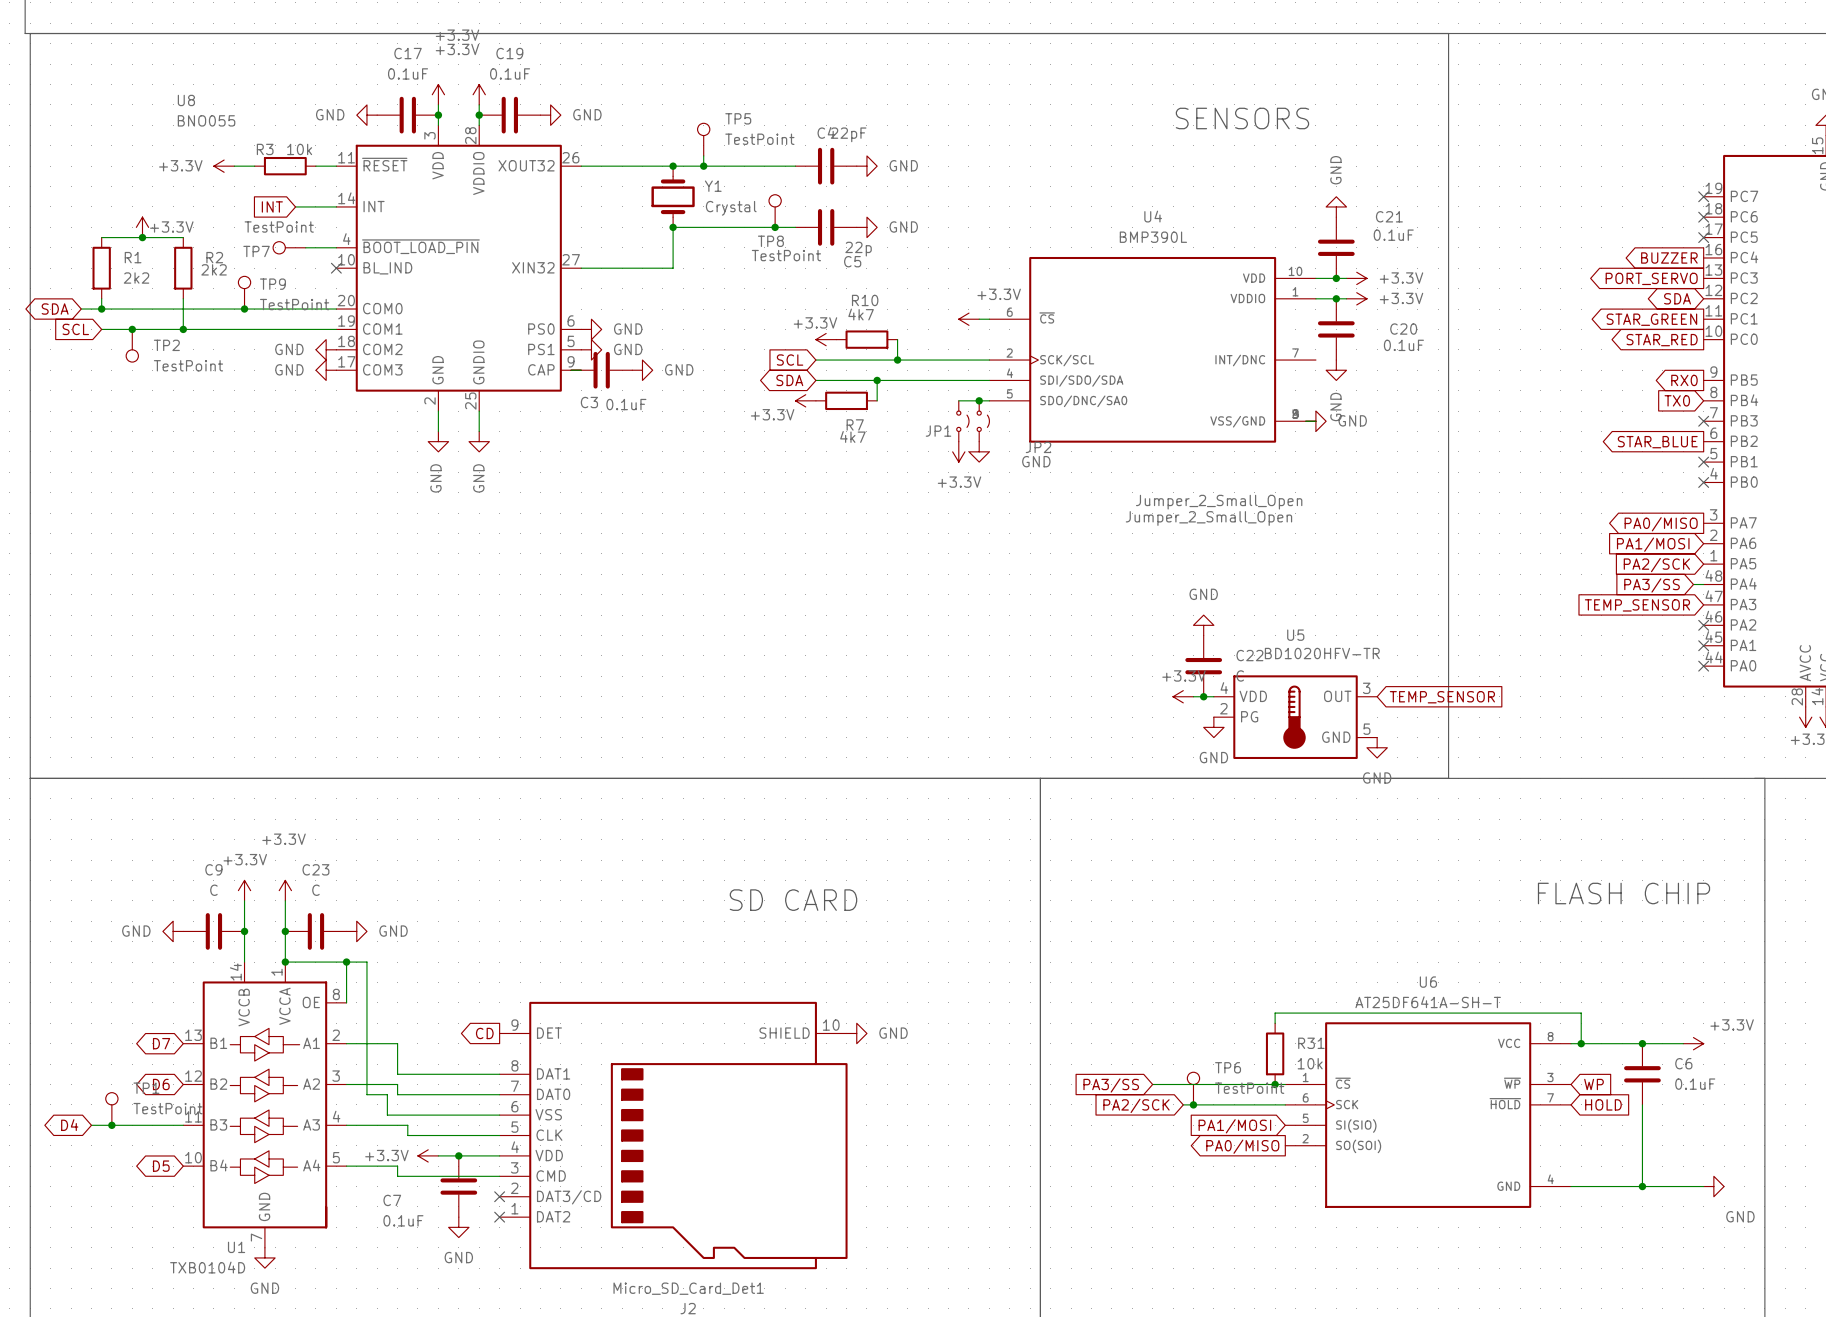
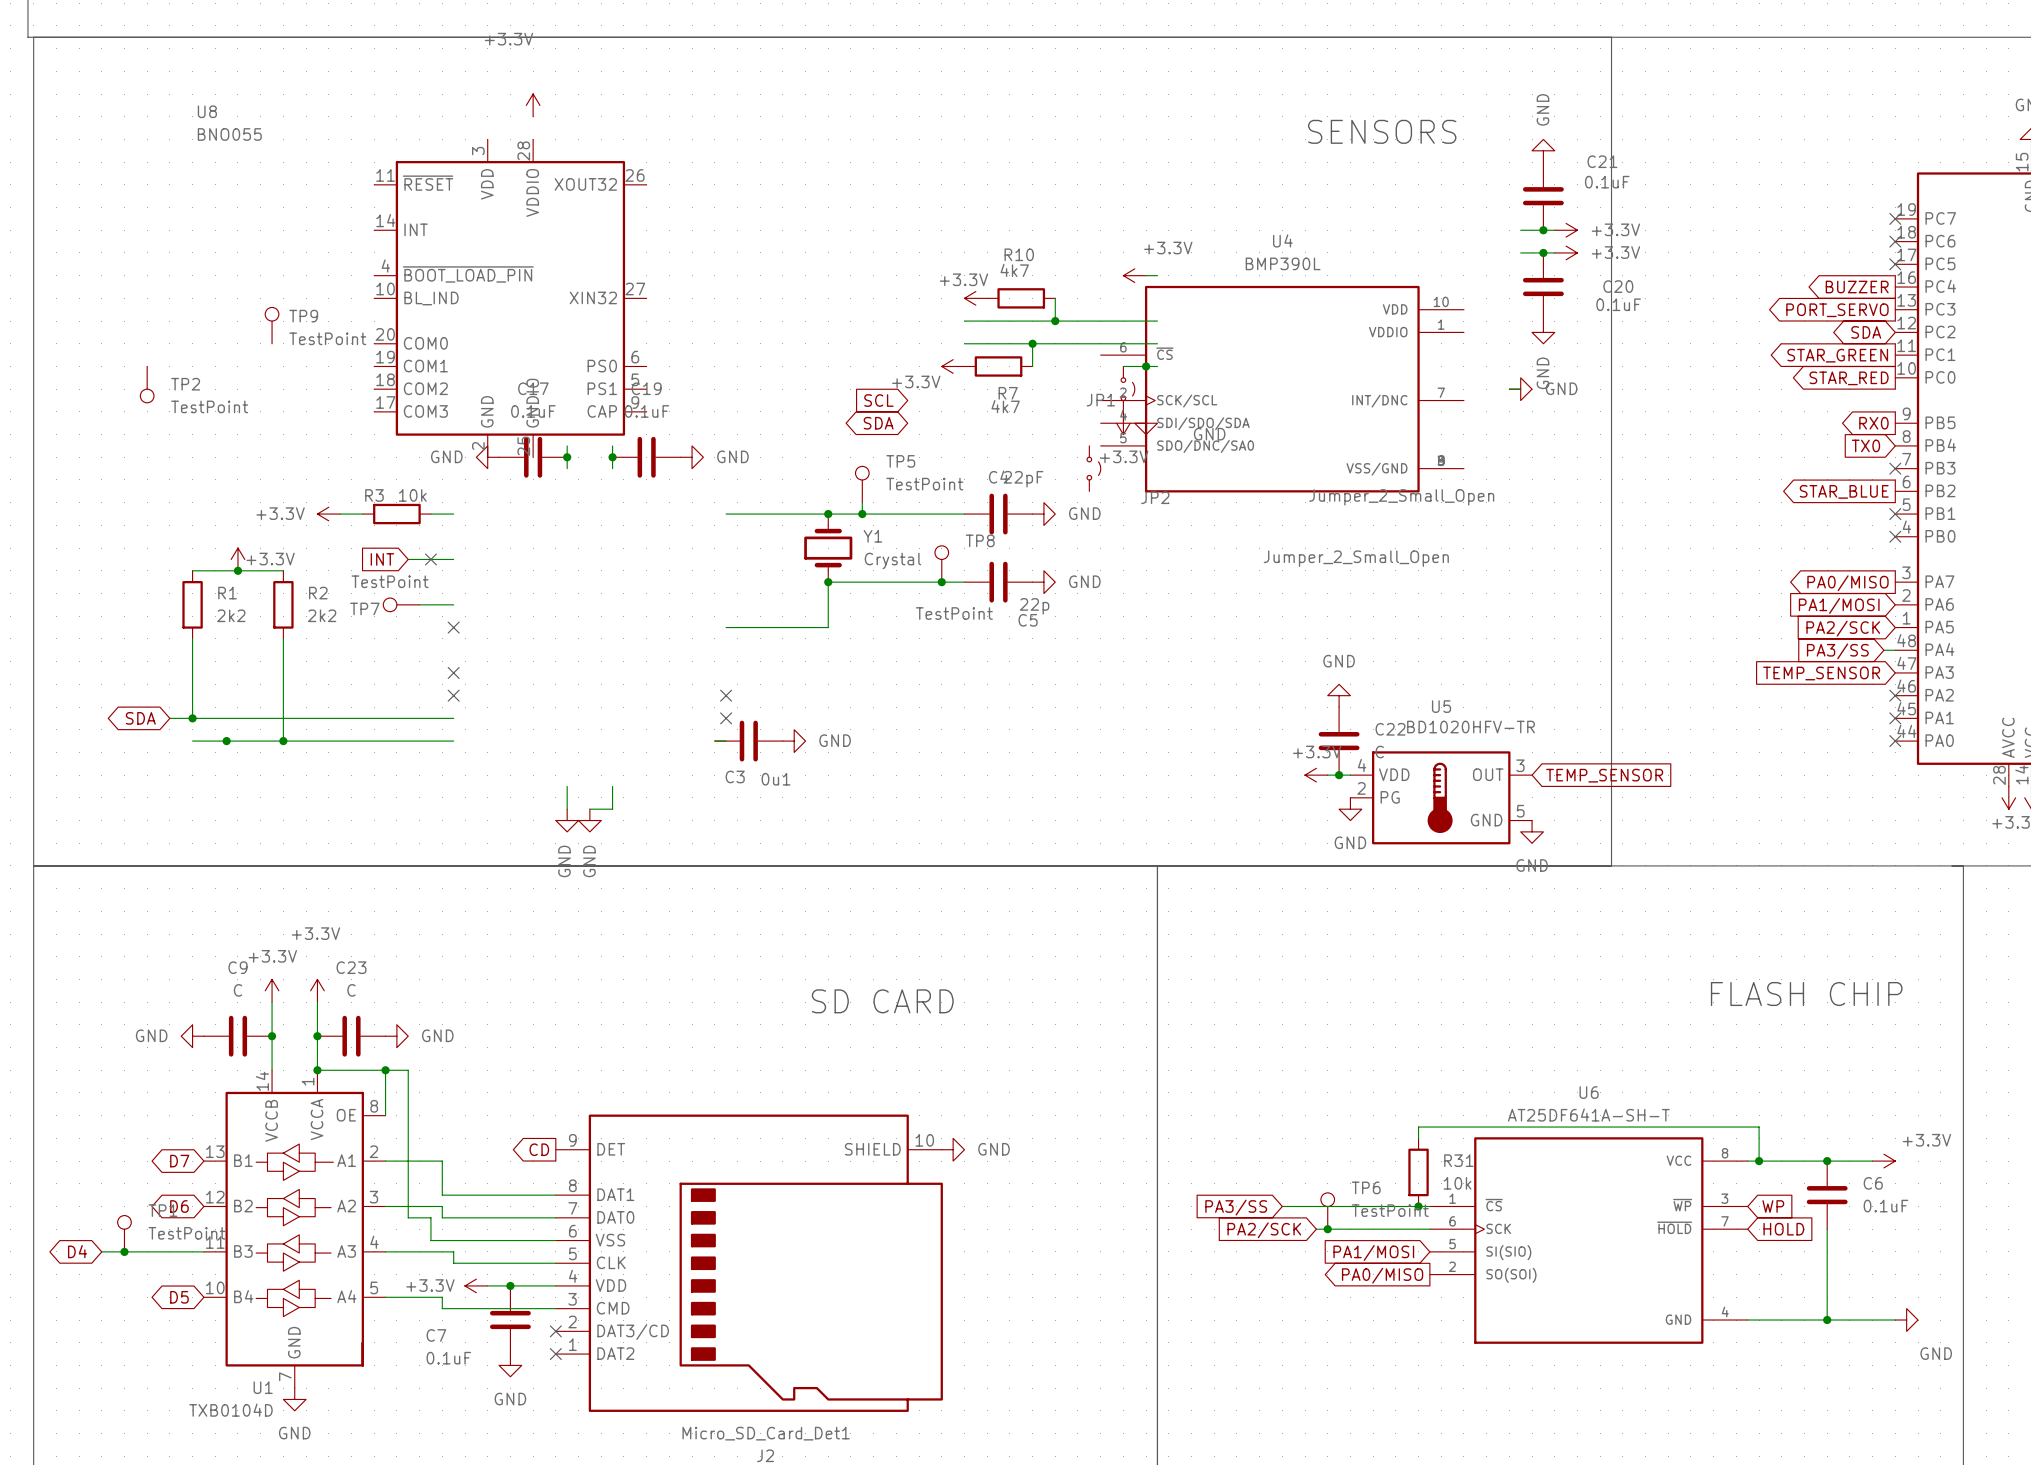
power symbol: +3.3V (438, 94) -> none
wire: (438, 104) (438, 125) -> none
wire: (479, 104) (479, 125) -> none
power symbol: GND (366, 115) -> none
C17 position: (407, 115) -> (533, 457)
junction: (438, 115) -> none
junction: (479, 115) -> none
C19 position: (509, 115) -> (646, 457)
power symbol: GND (550, 115) -> none
power symbol: none -> GND (1543, 150)
TP5 position: (703, 139) -> (862, 484)
wire: (703, 155) (703, 166) -> none
power symbol: +3.3V (224, 166) -> none
wire: (234, 166) (254, 166) -> none
R3 position: (285, 166) -> (396, 514)
wire: (315, 166) (336, 166) -> none
wire: (581, 166) (795, 166) -> none
junction: (673, 166) -> none
junction: (703, 166) -> none
C4 position: (826, 166) -> (998, 514)
power symbol: GND (866, 166) -> none
Y1 position: (673, 196) -> (828, 548)
global label: INT (272, 206) -> none
wire: (295, 206) (336, 206) -> none
power symbol: GND (1336, 206) -> none
junction: none -> (1543, 230)
power symbol: none -> +3.3V (1566, 230)
TP8 position: (775, 211) -> (941, 563)
power symbol: +3.3V (142, 227) -> none
junction: (673, 227) -> none
junction: (775, 227) -> none
wire: (795, 227) (673, 227) (673, 268) (581, 268) -> none
C5 position: (826, 227) -> (998, 582)
power symbol: GND (866, 227) -> none
junction: none -> (1543, 252)
power symbol: none -> +3.3V (1566, 252)
wire: (101, 237) (183, 237) -> none
junction: (142, 237) -> none
TP8 name position: TP8 (770, 241) -> TP8 (980, 540)
TP7 position: (289, 247) -> (401, 604)
wire: (305, 247) (336, 247) -> none
power symbol: none -> +3.3V (1134, 275)
C21 position: (1336, 247) -> (1543, 196)
R1 position: (101, 268) -> (192, 604)
R2 position: (183, 268) -> (283, 604)
no-connect mark: (336, 268) -> none
power symbol: none -> +3.3V (975, 298)
R2 value position: 2k2 (214, 269) -> 2k2 (322, 615)
wire: (1315, 278) (1346, 278) -> (1520, 230) (1554, 230)
junction: (1336, 278) -> none
power symbol: +3.3V (1356, 278) -> none
junction: none -> (1055, 321)
wire: (101, 298) (101, 309) -> none
wire: (183, 298) (183, 329) -> none
wire: (1315, 298) (1346, 298) -> (1520, 252) (1554, 252)
junction: (1336, 298) -> none
power symbol: +3.3V (1356, 298) -> none
power symbol: none -> GND (1543, 332)
global label: SDA (55, 309) -> none
wire: (81, 309) (336, 309) -> none
junction: (101, 309) -> none
junction: (244, 309) -> none
junction: none -> (1032, 343)
power symbol: +3.3V (968, 319) -> none
wire: (979, 319) (989, 319) -> (1146, 275) (1157, 275)
power symbol text position: +3.3V (815, 322) -> +3.3V (916, 381)
global label: SCL (75, 329) -> none
wire: (101, 329) (336, 329) -> none
junction: (132, 329) -> none
junction: (183, 329) -> none
power symbol: GND (591, 329) -> none
junction: none -> (1146, 366)
C20 position: (1336, 329) -> (1543, 287)
power symbol position: +3.3V (826, 339) -> +3.3V (953, 366)
R10 position: (866, 339) -> (1021, 298)
wire: (897, 339) (897, 360) -> (1055, 298) (1055, 321)
power symbol: GND (326, 349) -> none
power symbol: GND (591, 349) -> none
wire: (815, 360) (989, 360) -> (964, 321) (1157, 321)
junction: (897, 360) -> none
power symbol: GND (326, 370) -> none
C3 position: (601, 370) -> (748, 741)
power symbol: GND (642, 370) -> none
power symbol rotation: 0° (1336, 370) -> 90° counterclockwise (1520, 389)
power symbol position: GND (1336, 370) -> GND (1520, 389)
wire: (815, 380) (989, 380) -> (964, 343) (1157, 343)
wire: (877, 380) (877, 400) -> (1032, 343) (1032, 366)
junction: (877, 380) -> none
power symbol: none -> +3.3V (1123, 423)
power symbol: none -> GND (1146, 423)
power symbol: +3.3V (805, 400) -> none
R7 position: (846, 400) -> (998, 366)
wire: (958, 400) (989, 400) -> (1123, 366) (1157, 366)
junction: (979, 400) -> none
C3 value: 0.1uF (626, 404) -> 0u1 (776, 779)
wire: (438, 411) (438, 431) -> (567, 445) (567, 468)
power symbol: none -> GND (487, 457)
wire: (479, 411) (479, 431) -> (612, 445) (612, 468)
junction: none -> (567, 457)
junction: none -> (612, 457)
power symbol: none -> GND (692, 457)
JP1 position: (962, 421) -> (1127, 389)
power symbol: GND (1315, 421) -> none
power symbol: GND (438, 441) -> none
power symbol: GND (479, 441) -> none
wire: none -> (862, 502) (862, 514)
power symbol: +3.3V (958, 451) -> none
power symbol: GND (979, 451) -> none
power symbol: none -> +3.3V (328, 514)
wire: none -> (340, 514) (362, 514)
wire: none -> (430, 514) (453, 514)
wire: none -> (726, 514) (964, 514)
junction: none -> (828, 514)
junction: none -> (862, 514)
power symbol: none -> GND (1043, 514)
power symbol: none -> +3.3V (237, 559)
global label: none -> INT (382, 559)
wire: none -> (408, 559) (453, 559)
no-connect mark: none -> (430, 559)
wire: none -> (192, 570) (283, 570)
junction: none -> (237, 570)
junction: none -> (828, 582)
junction: none -> (941, 582)
wire: none -> (964, 582) (828, 582) (828, 627) (726, 627)
power symbol: none -> GND (1043, 582)
wire: none -> (419, 604) (453, 604)
no-connect mark: none -> (453, 627)
wire: none -> (192, 638) (192, 718)
wire: none -> (283, 638) (283, 741)
no-connect mark: none -> (453, 672)
no-connect mark: none -> (453, 695)
no-connect mark: none -> (726, 695)
global label: none -> SDA (140, 718)
wire: none -> (169, 718) (453, 718)
junction: none -> (192, 718)
no-connect mark: none -> (726, 718)
wire: none -> (192, 741) (453, 741)
junction: none -> (226, 741)
junction: none -> (283, 741)
wire: none -> (714, 741) (726, 741)
power symbol: none -> GND (794, 741)
wire: none -> (567, 786) (567, 809)
wire: none -> (612, 786) (612, 809) (589, 809)
power symbol: none -> GND (567, 820)
power symbol: none -> GND (589, 820)

